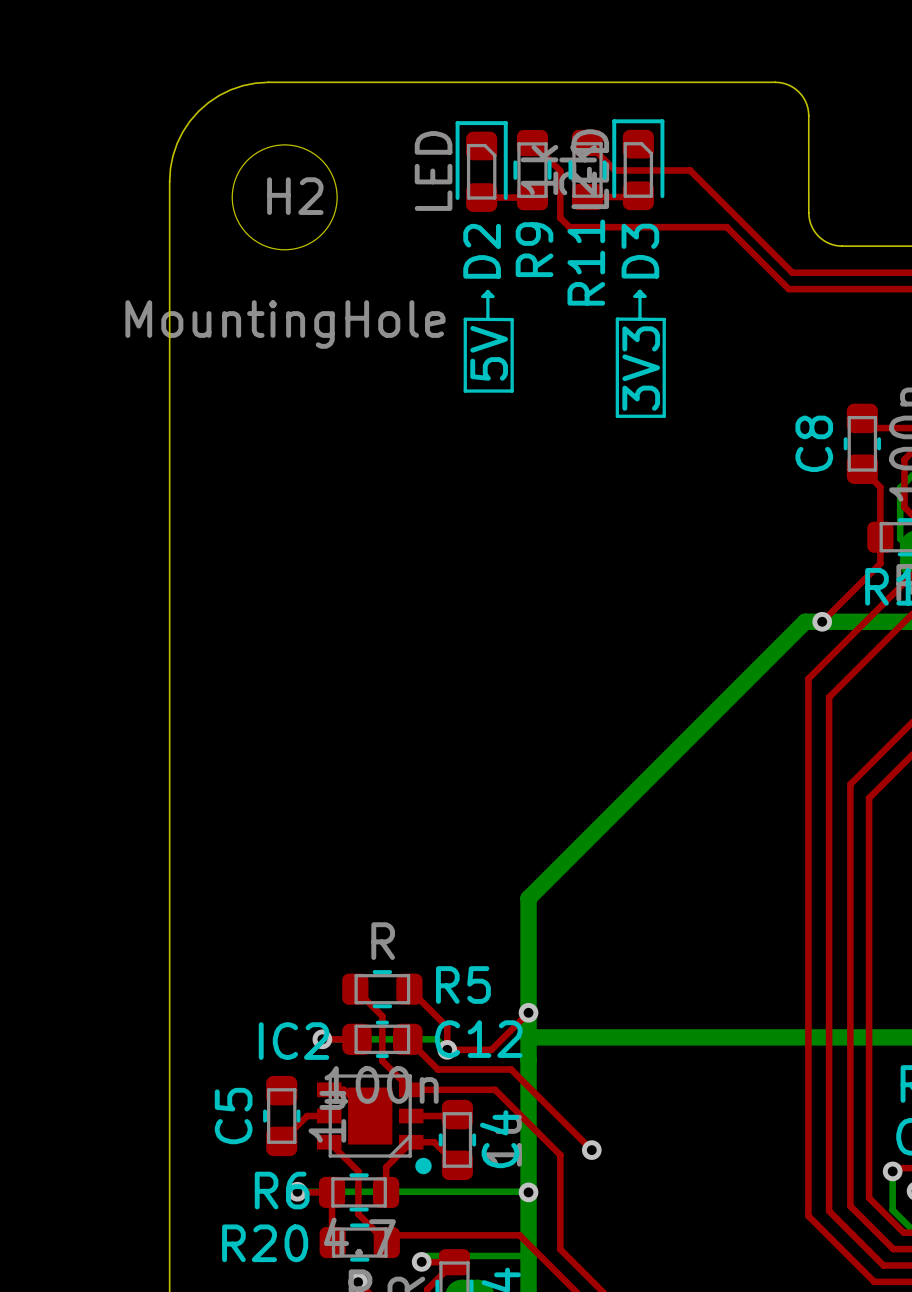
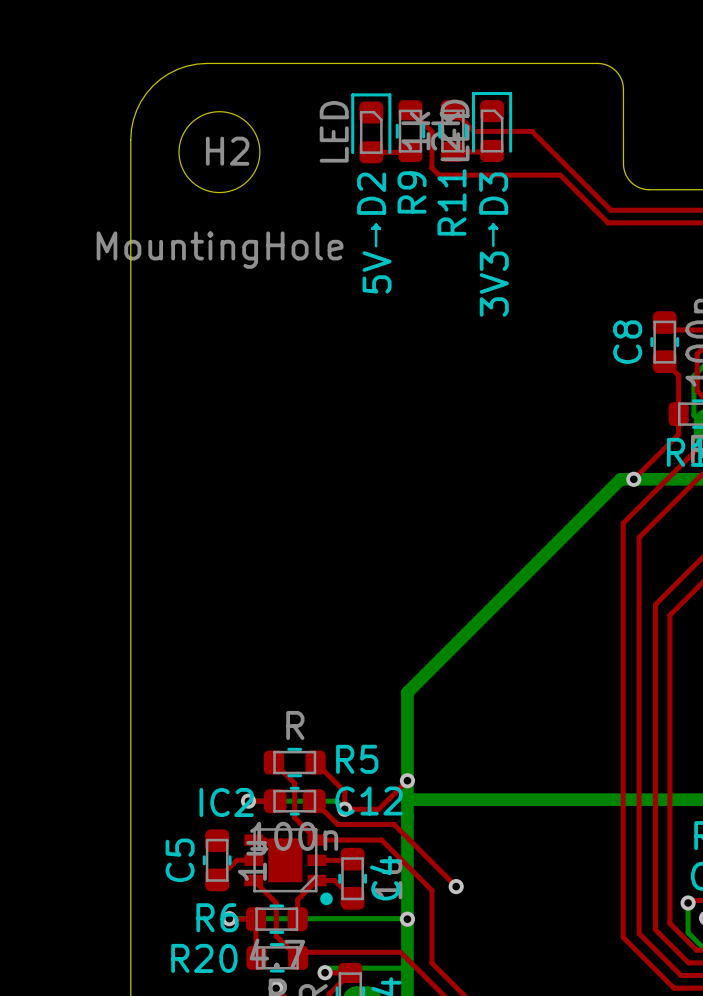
line: (465, 319) (512, 319) (512, 391) (465, 391) (465, 319) -> none
line: (617, 319) (664, 319) (664, 416) (617, 416) (617, 319) -> none

